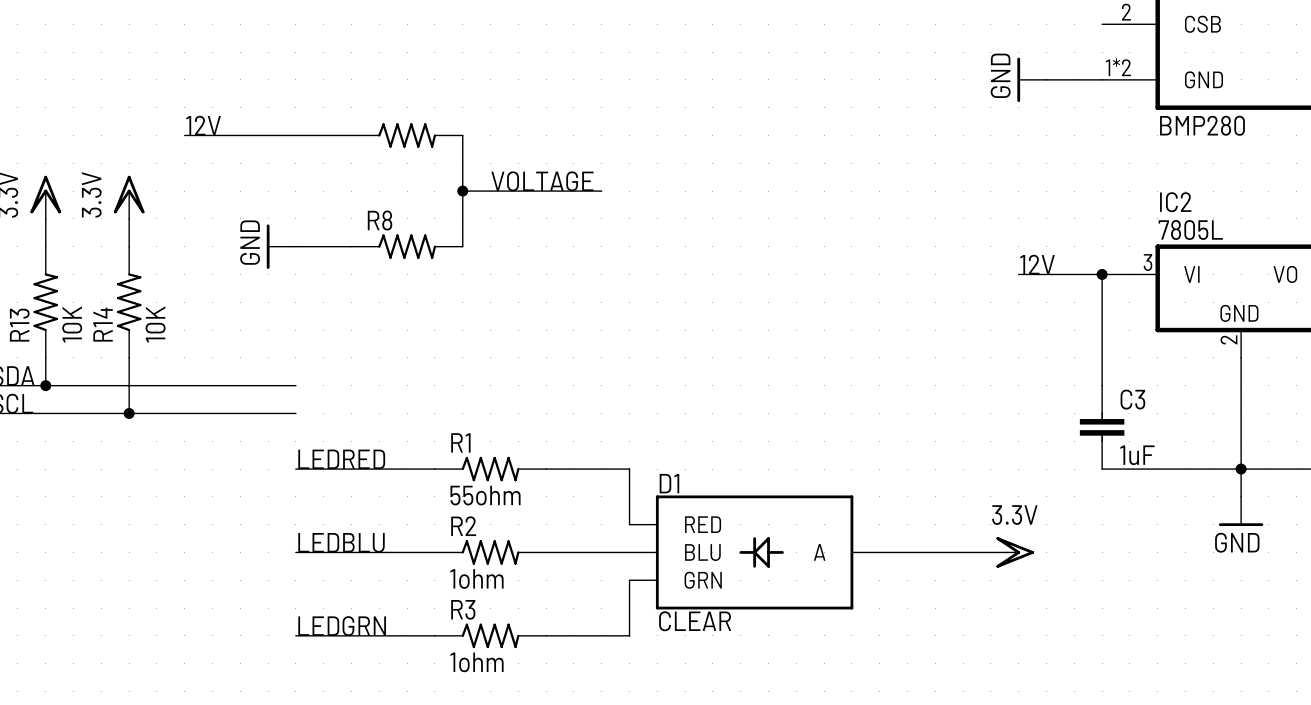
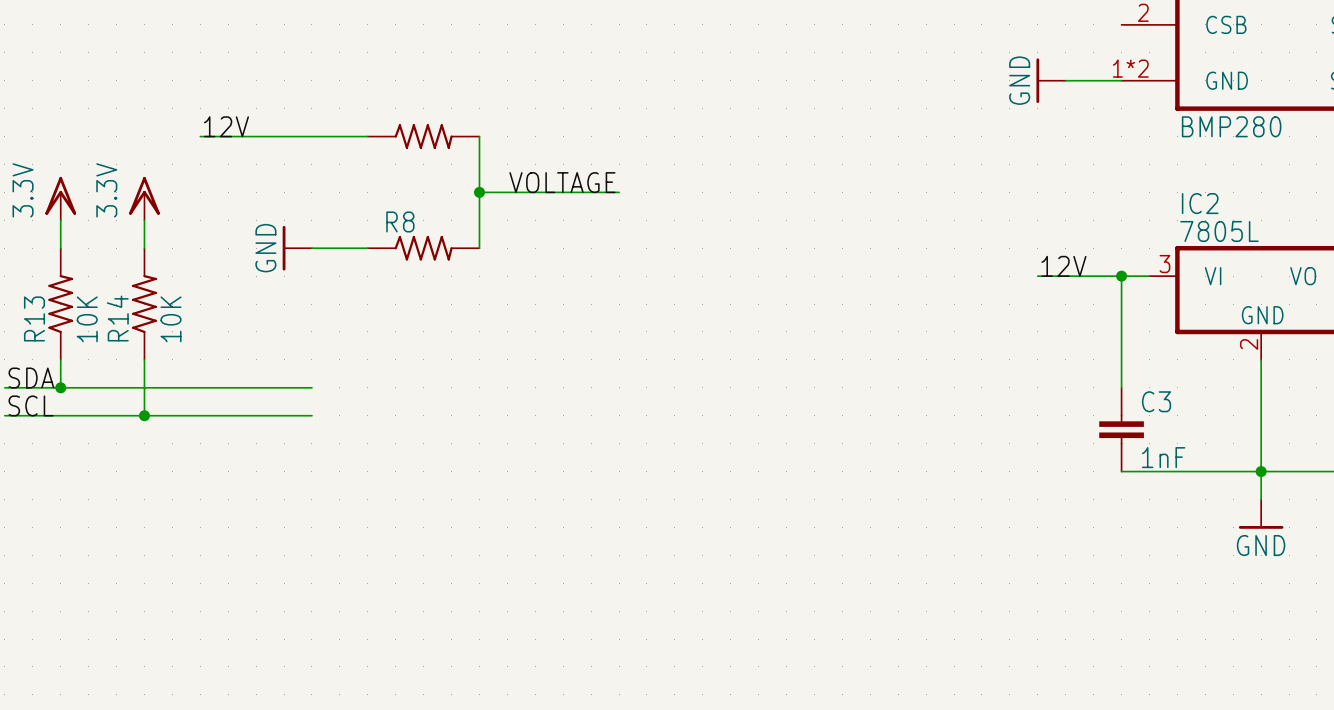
C3 value: 1uF (1137, 455) -> 1nF (1163, 457)
label: LEDRED (341, 459) -> none
wire: (295, 469) (434, 469) -> none
R1: 55ohm (490, 469) -> none
wire: (546, 469) (629, 469) (629, 524) -> none
label: LEDBLU (341, 542) -> none
wire: (295, 552) (434, 552) -> none
R2: 1ohm (490, 552) -> none
wire: (546, 552) (629, 552) -> none
D1: CLEAR (754, 552) -> none
wire: (879, 552) (990, 552) -> none
power symbol: 3.3V (1012, 552) -> none
wire: (629, 580) (629, 635) (546, 635) -> none
label: LEDGRN (342, 626) -> none
wire: (295, 635) (434, 635) -> none
R3: 1ohm (490, 635) -> none

